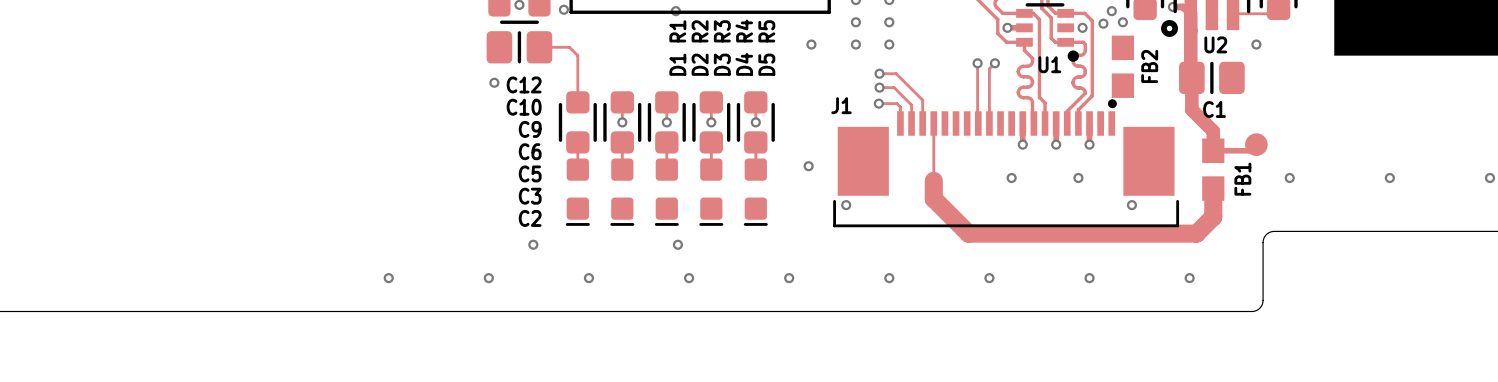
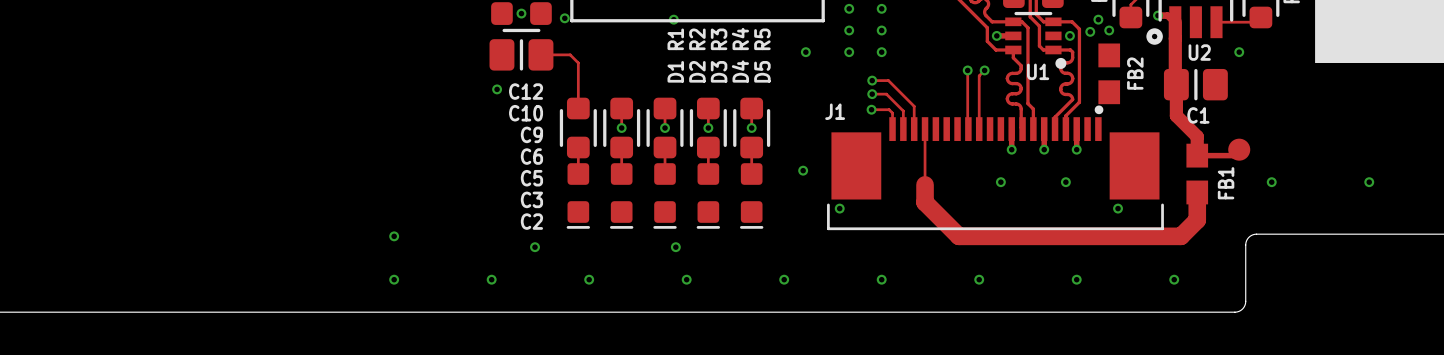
via: none -> (394, 236)

